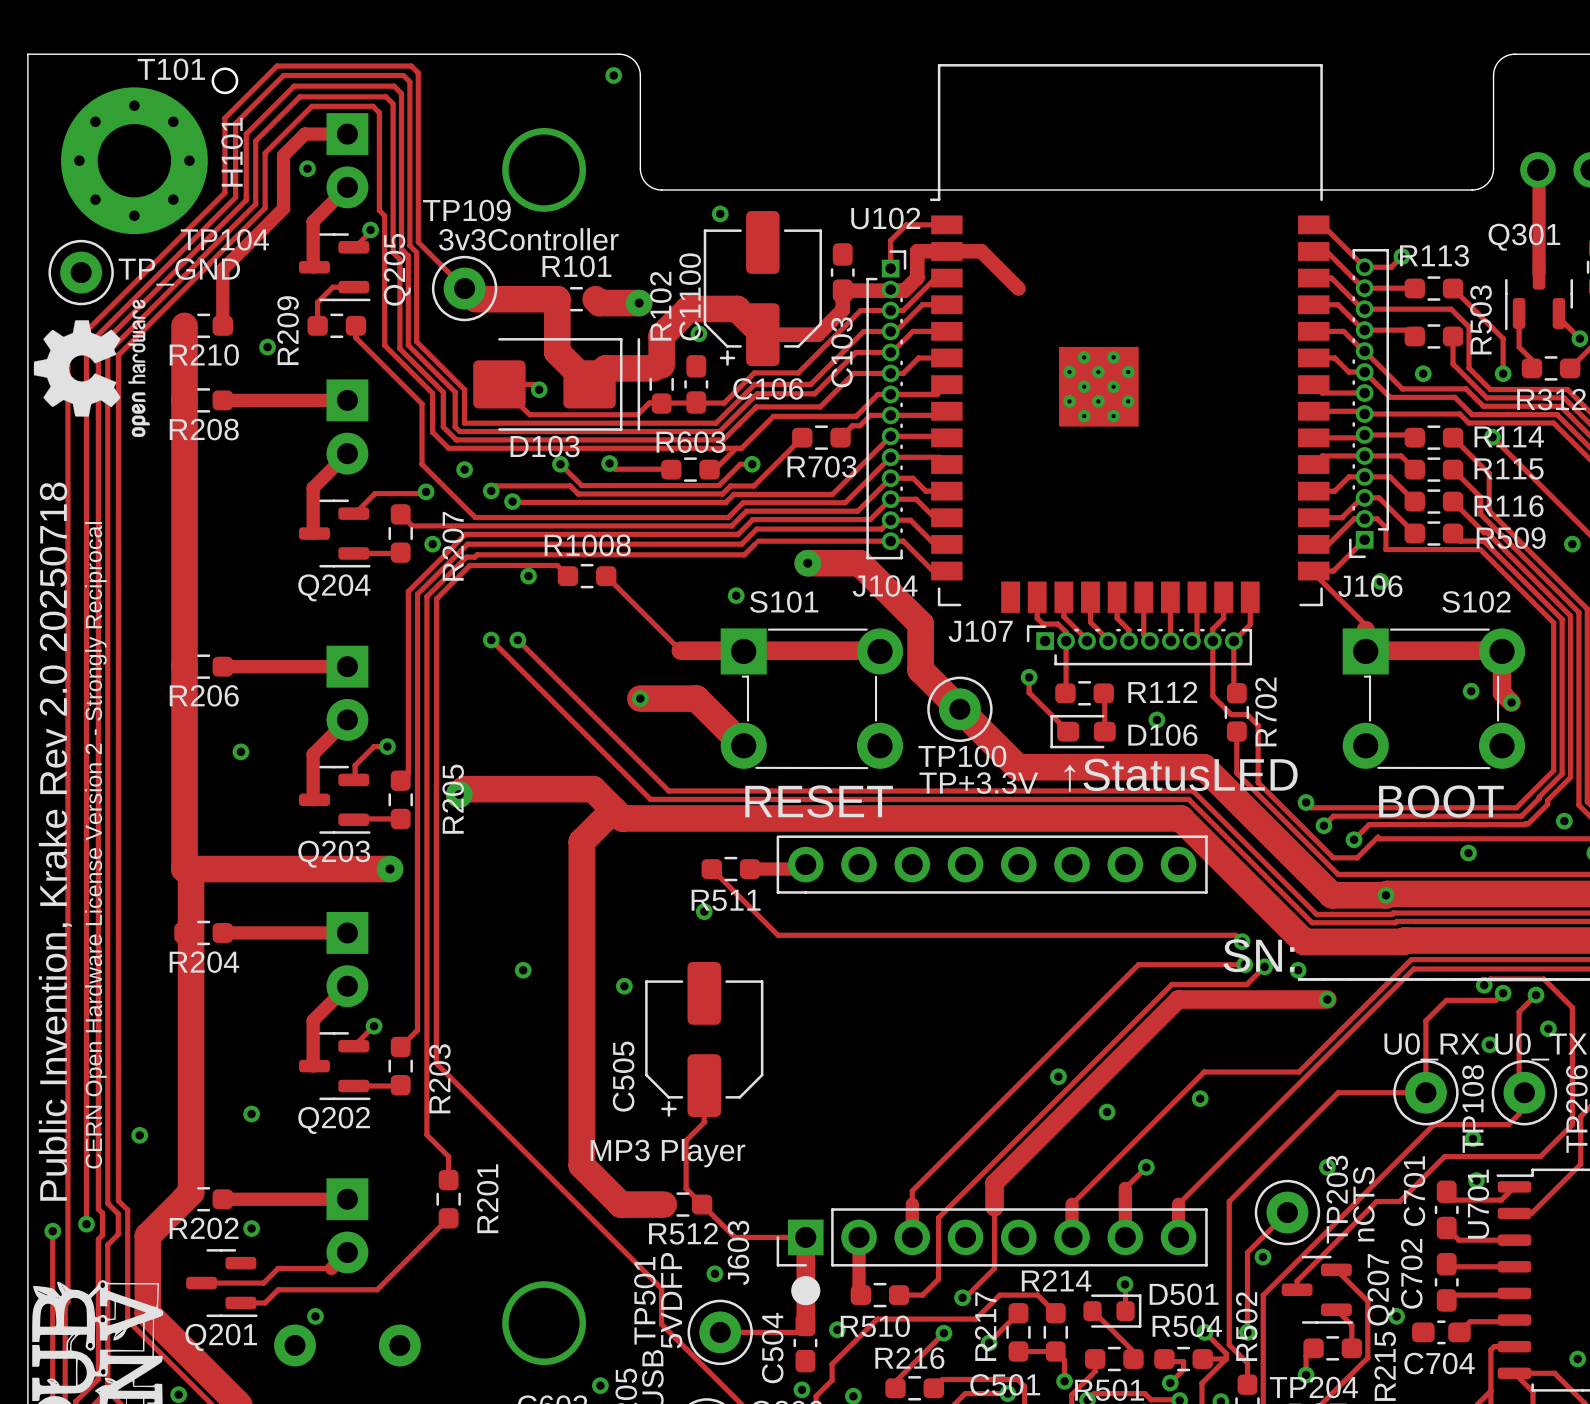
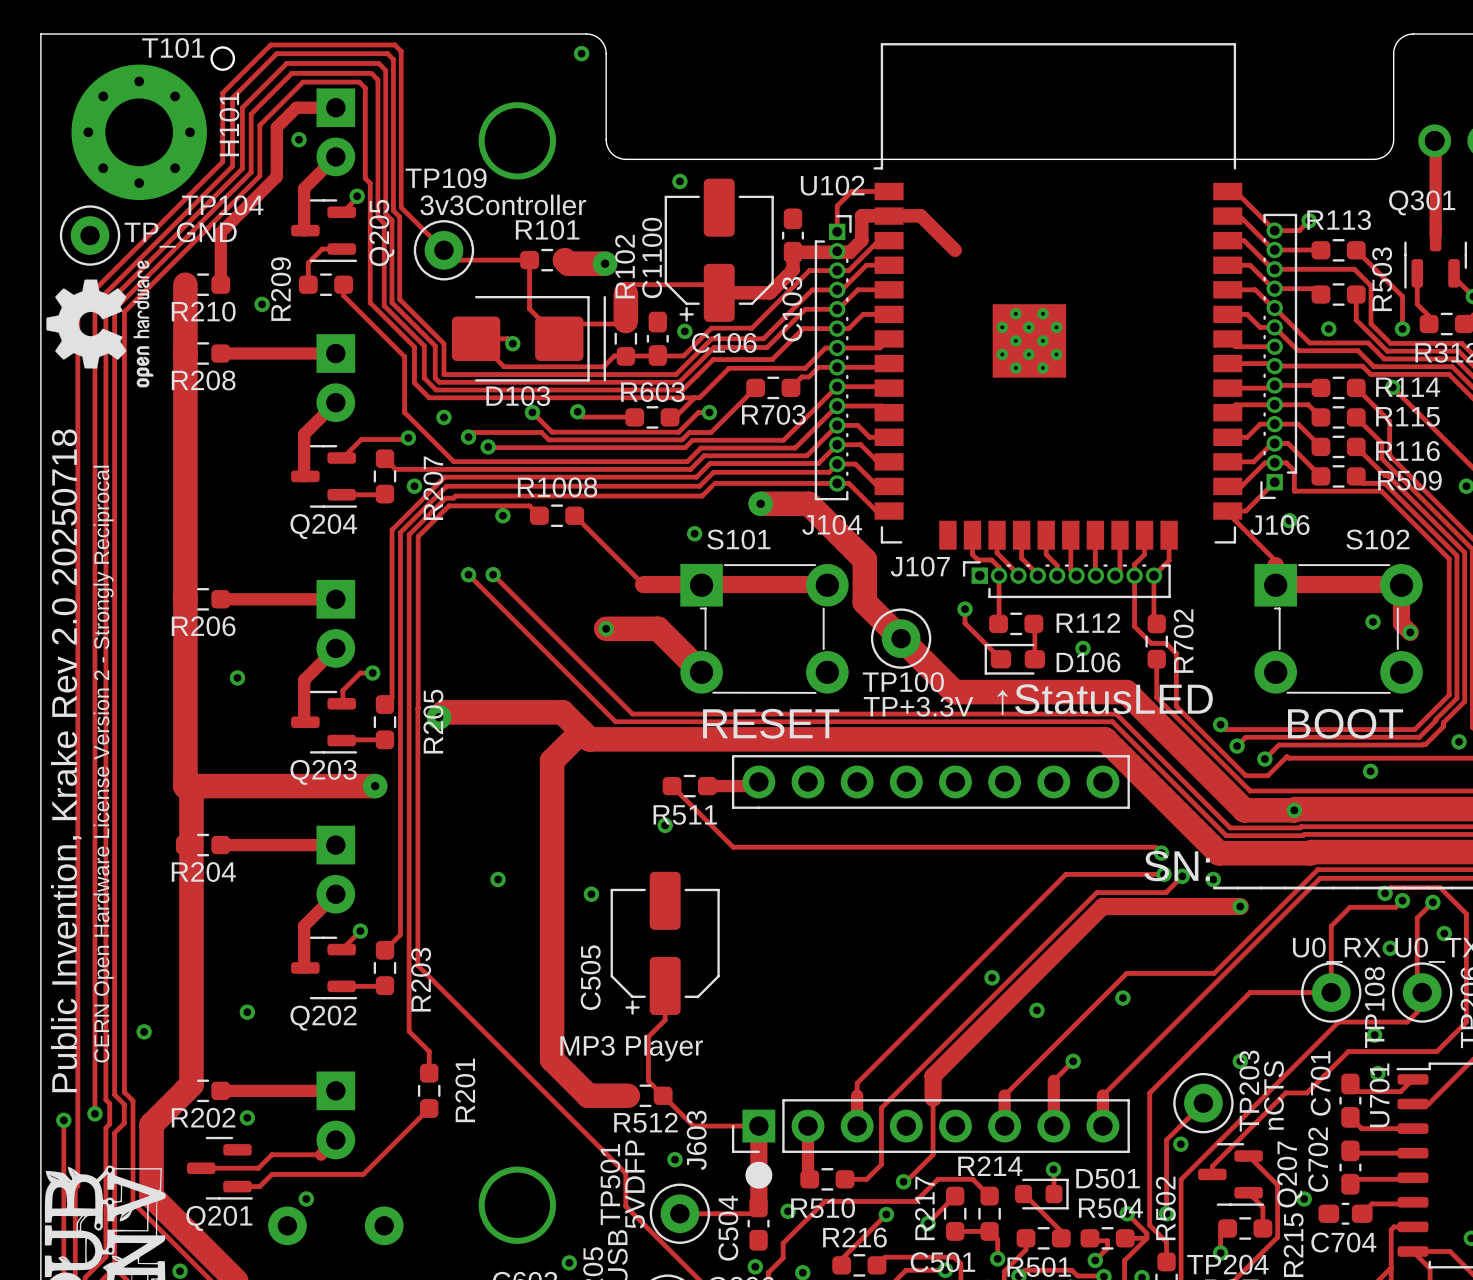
track width: thick (475, 299) (557, 299) (557, 352) (589, 384) (605, 368) (653, 368) -> thin (453, 260) (529, 260) (529, 308) (559, 338) (574, 324) (618, 324)
track: (754, 325) (737, 308) (688, 308) (661, 335) -> (711, 284) (630, 284) (625, 289) (625, 294)
via position: (698, 333) -> (684, 331)

